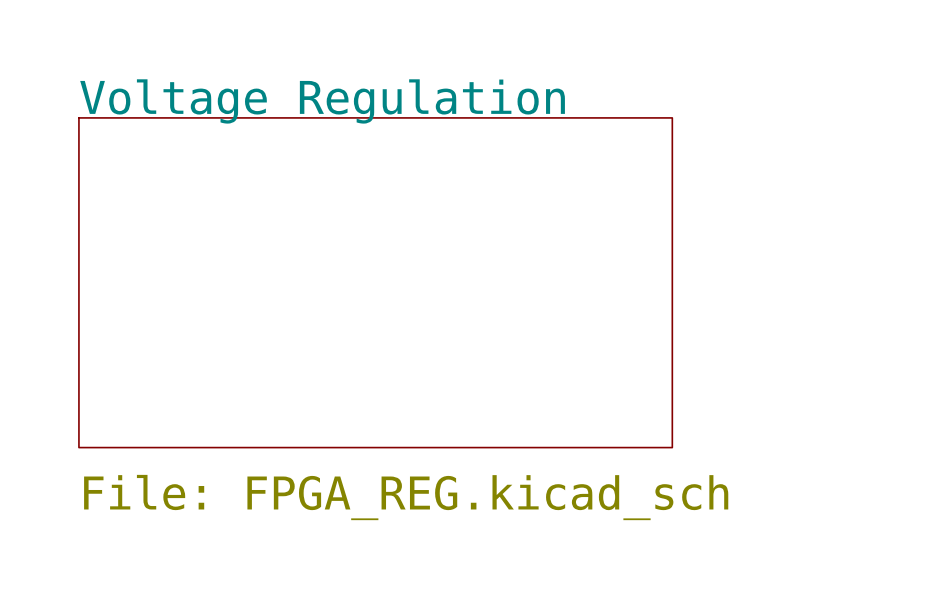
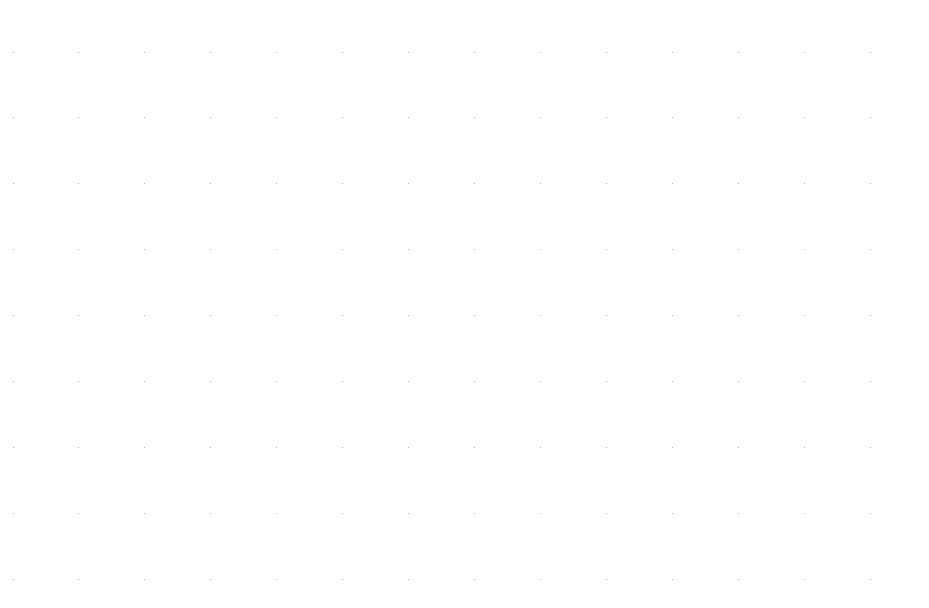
sheet Voltage Regulation: File: FPGA_REG.kicad_sch (375, 282) -> none

